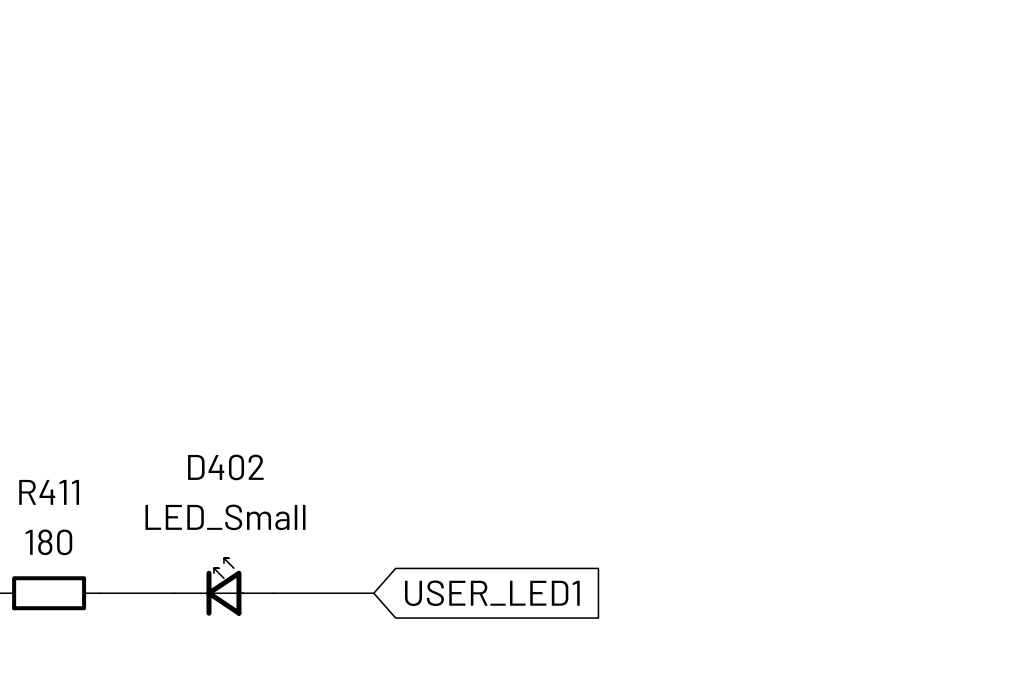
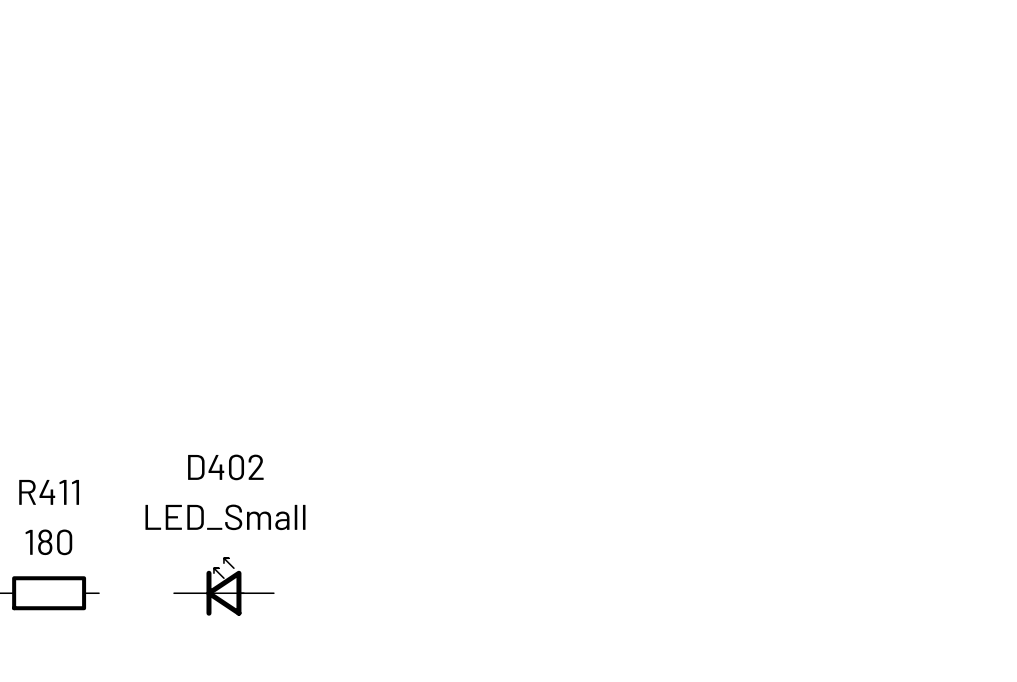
wire: (99, 593) (174, 593) -> none
wire: (273, 593) (373, 593) -> none
global label: USER_LED1 (492, 593) -> none

